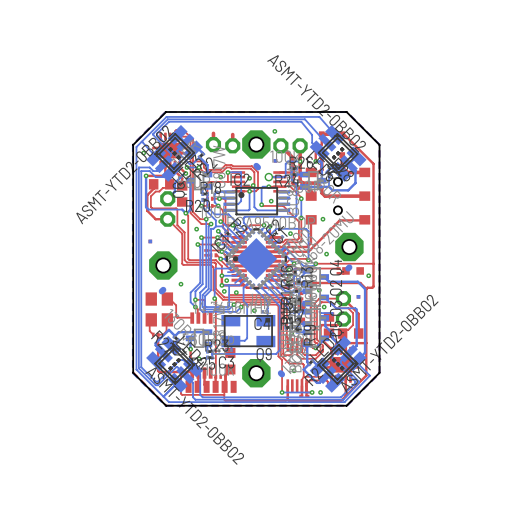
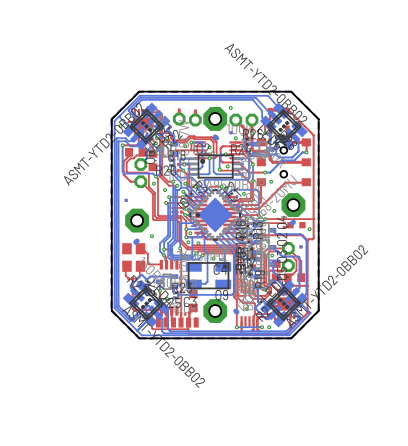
bottom track: (300, 161) (288, 161) (285, 163) (284, 177) (268, 177) -> none
via: none -> (235, 138)
top track: none -> (306, 142) (306, 152)
top track: none -> (225, 146) (220, 148) (220, 160) (222, 162) (238, 162) (248, 172) (265, 172)
via: (268, 177) -> none
bottom track: none -> (306, 152) (302, 152) (294, 160) (282, 160) (270, 172) (265, 172)
via: none -> (306, 152)
via: none -> (265, 172)

